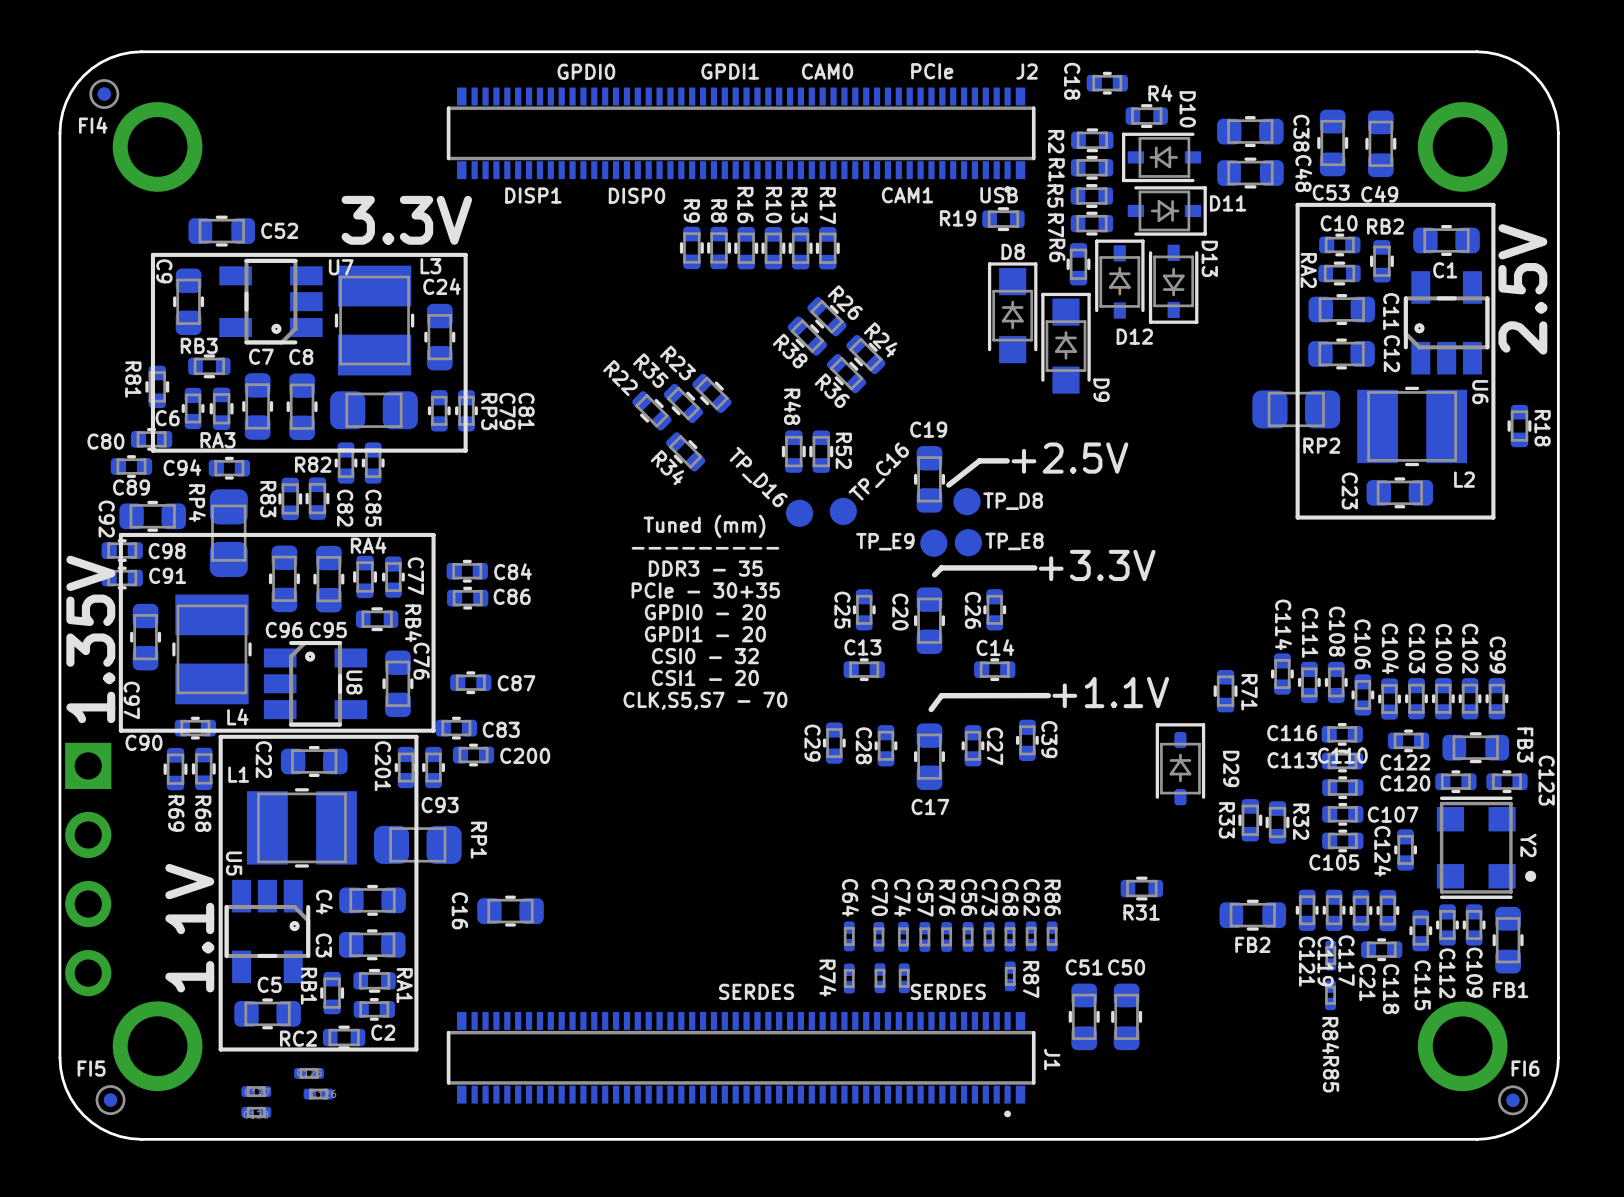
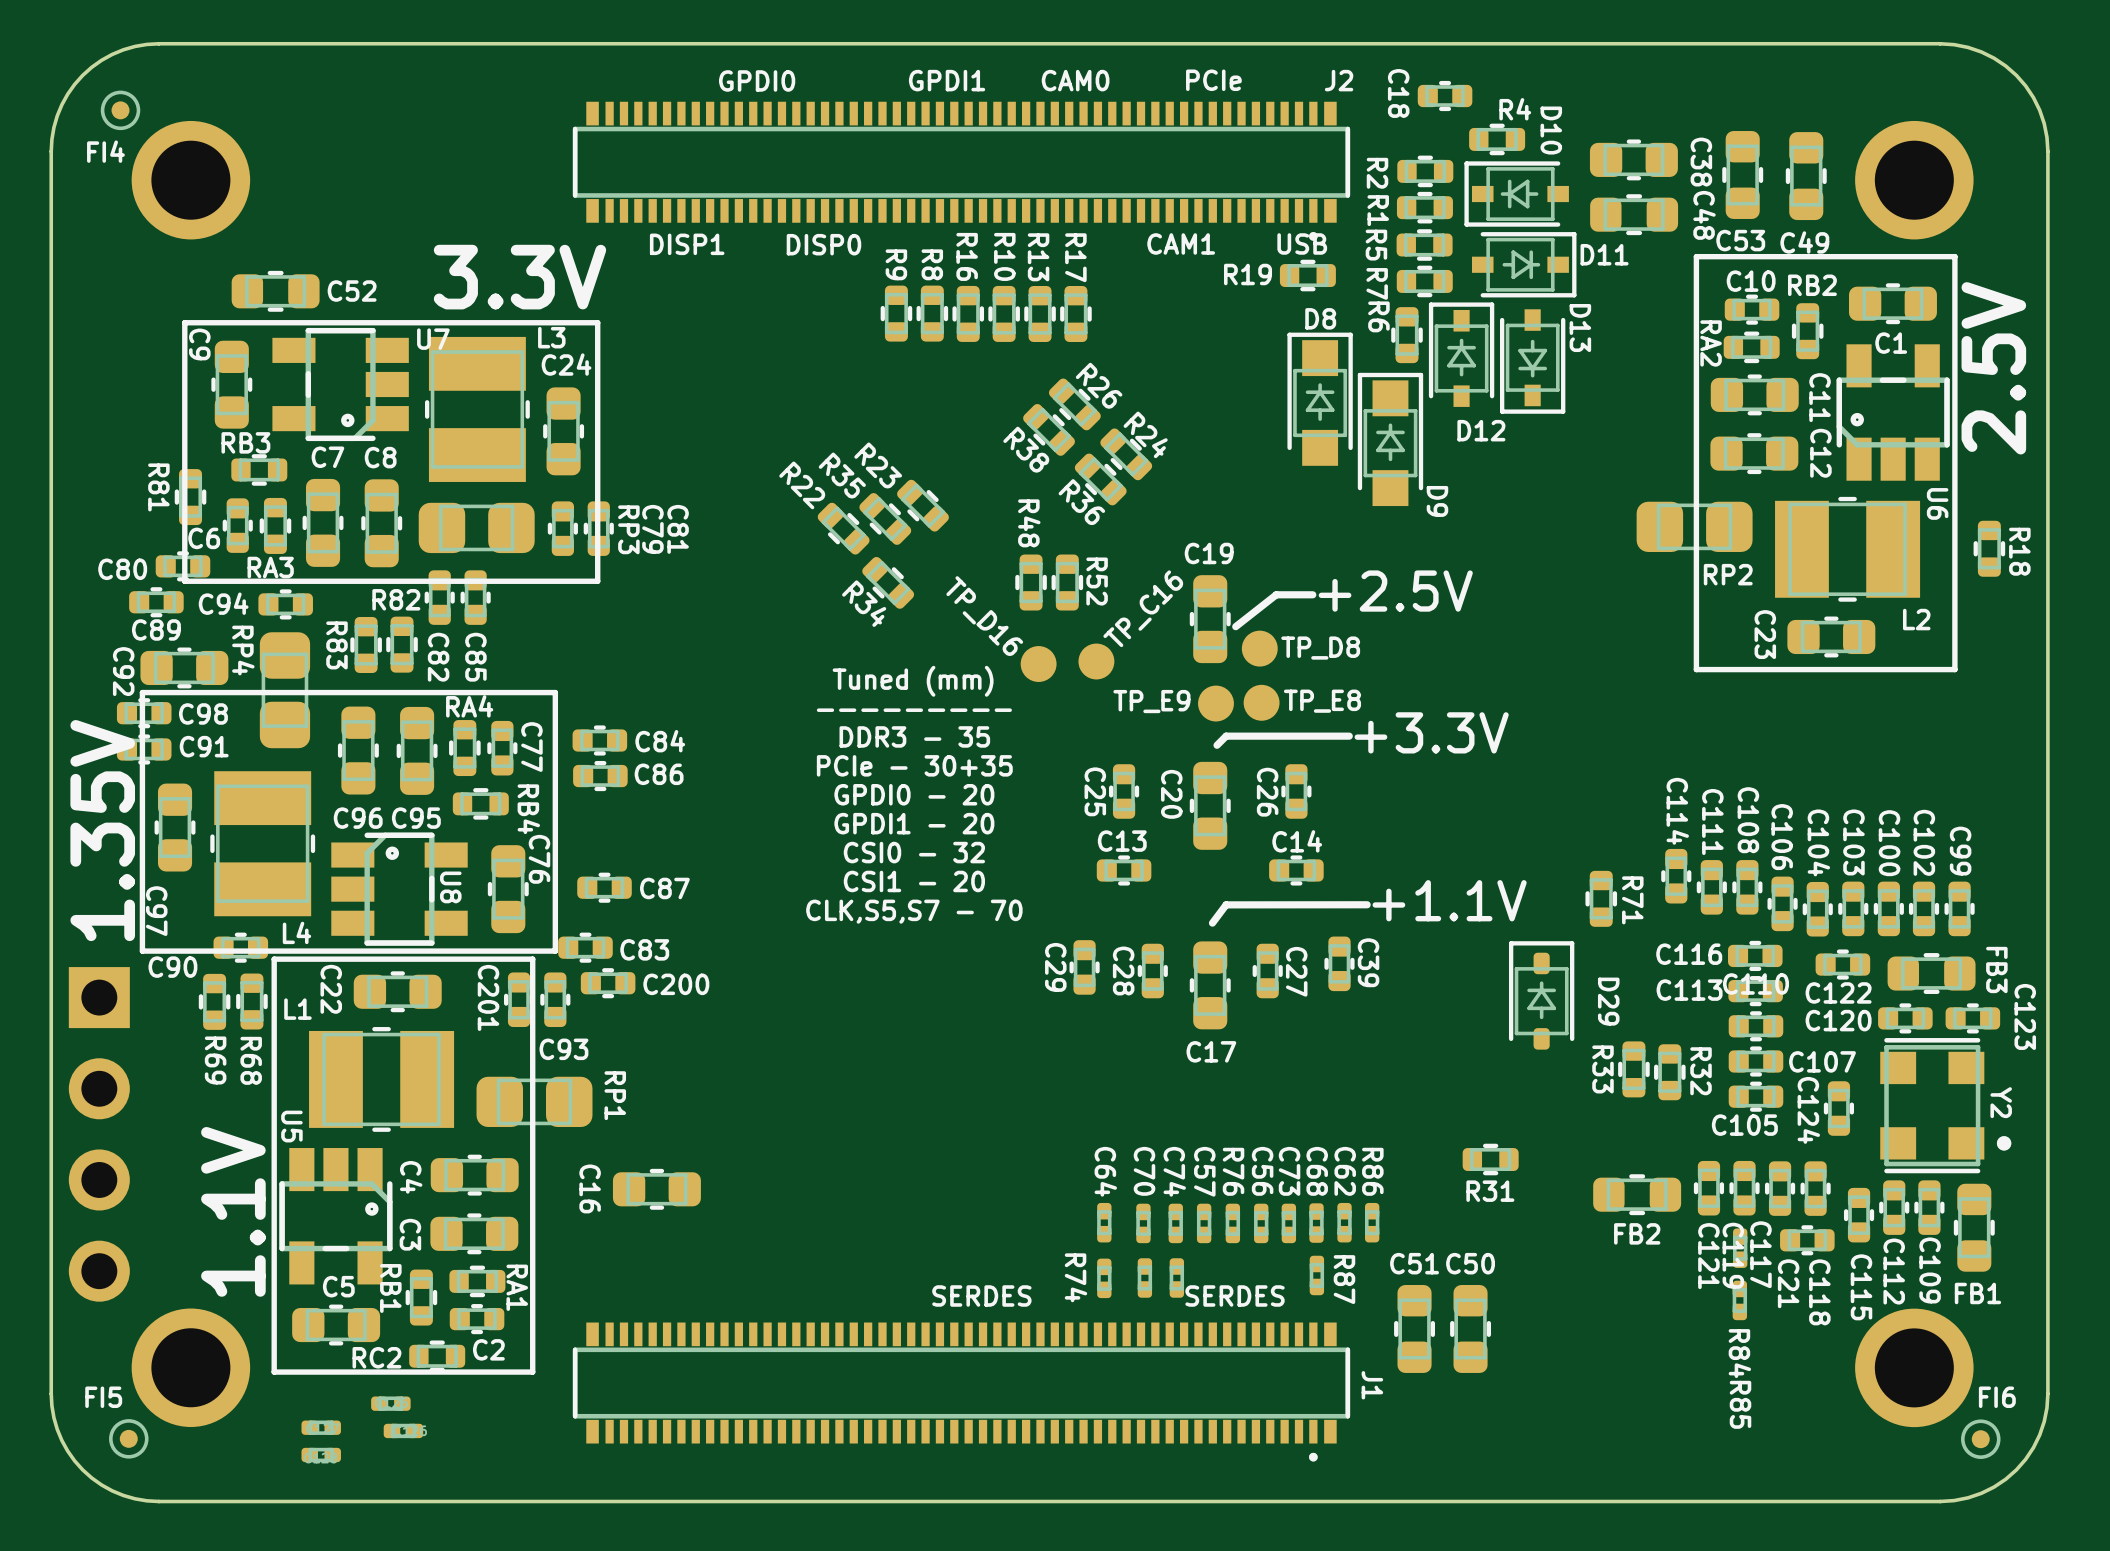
board edge: (1476, 51) (141, 51) (120, 54) (91, 68) (76, 83) (66, 102) (59, 133) (59, 1057) (62, 1078) (76, 1107) (100, 1128) (120, 1136) (141, 1139) (1476, 1139) (1503, 1134) (1527, 1121) (1540, 1108) (1550, 1093) (1556, 1075) (1558, 1057) (1558, 133) (1552, 102) (1534, 75) (1508, 57) (1476, 51) -> (1940, 43) (1968, 47) (1981, 51) (2005, 66) (2016, 75) (2025, 85) (2039, 110) (2044, 123) (2047, 151) (2047, 1393) (2044, 1421) (2033, 1447) (2025, 1459) (2005, 1479) (1994, 1487) (1968, 1497) (1940, 1501) (158, 1501) (134, 1498) (112, 1490) (91, 1478) (74, 1460) (57, 1429) (51, 1393) (51, 151) (53, 127) (61, 104) (74, 84) (91, 67) (123, 49) (158, 43) (1940, 43)

